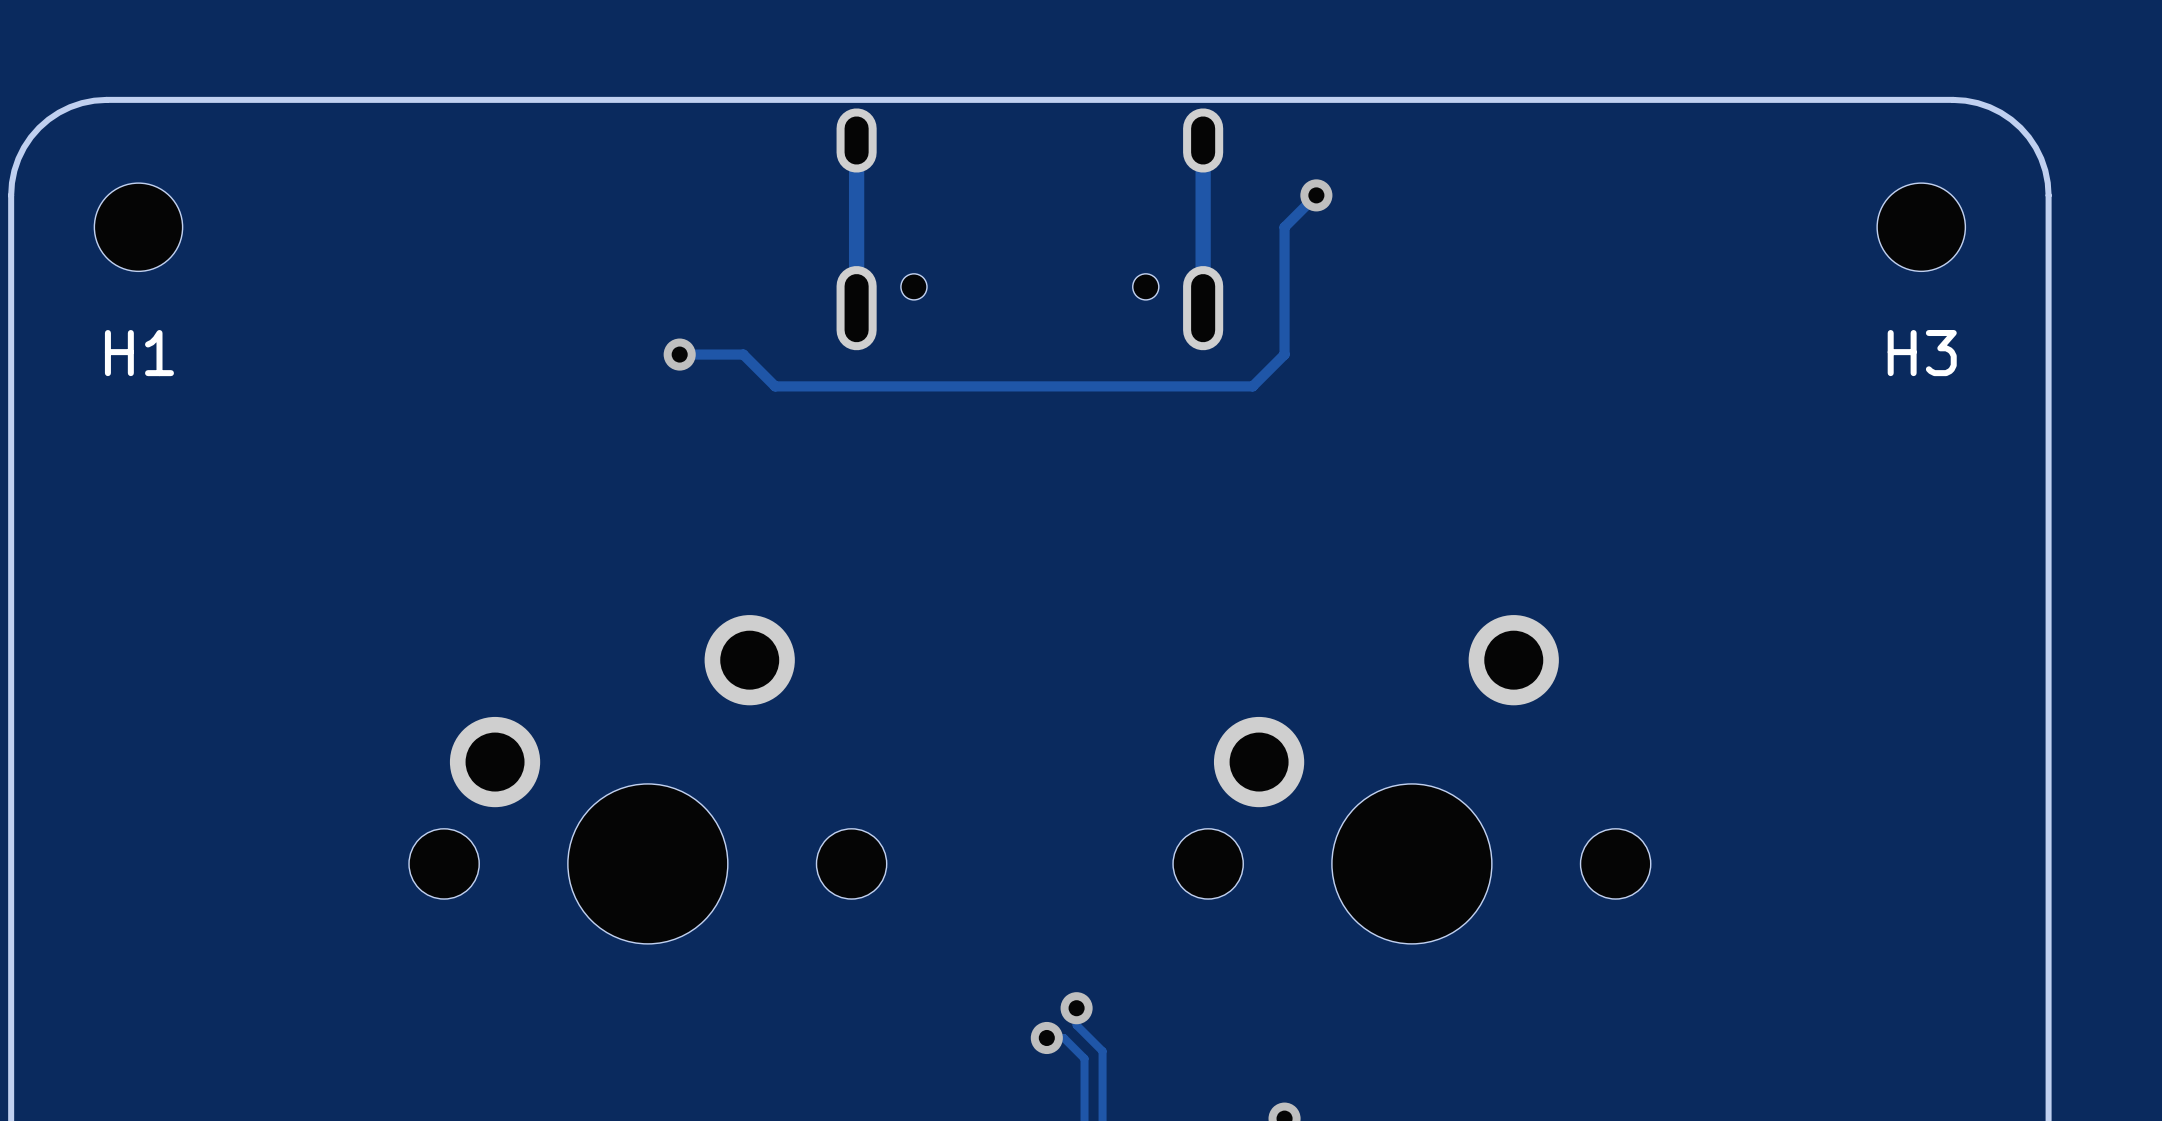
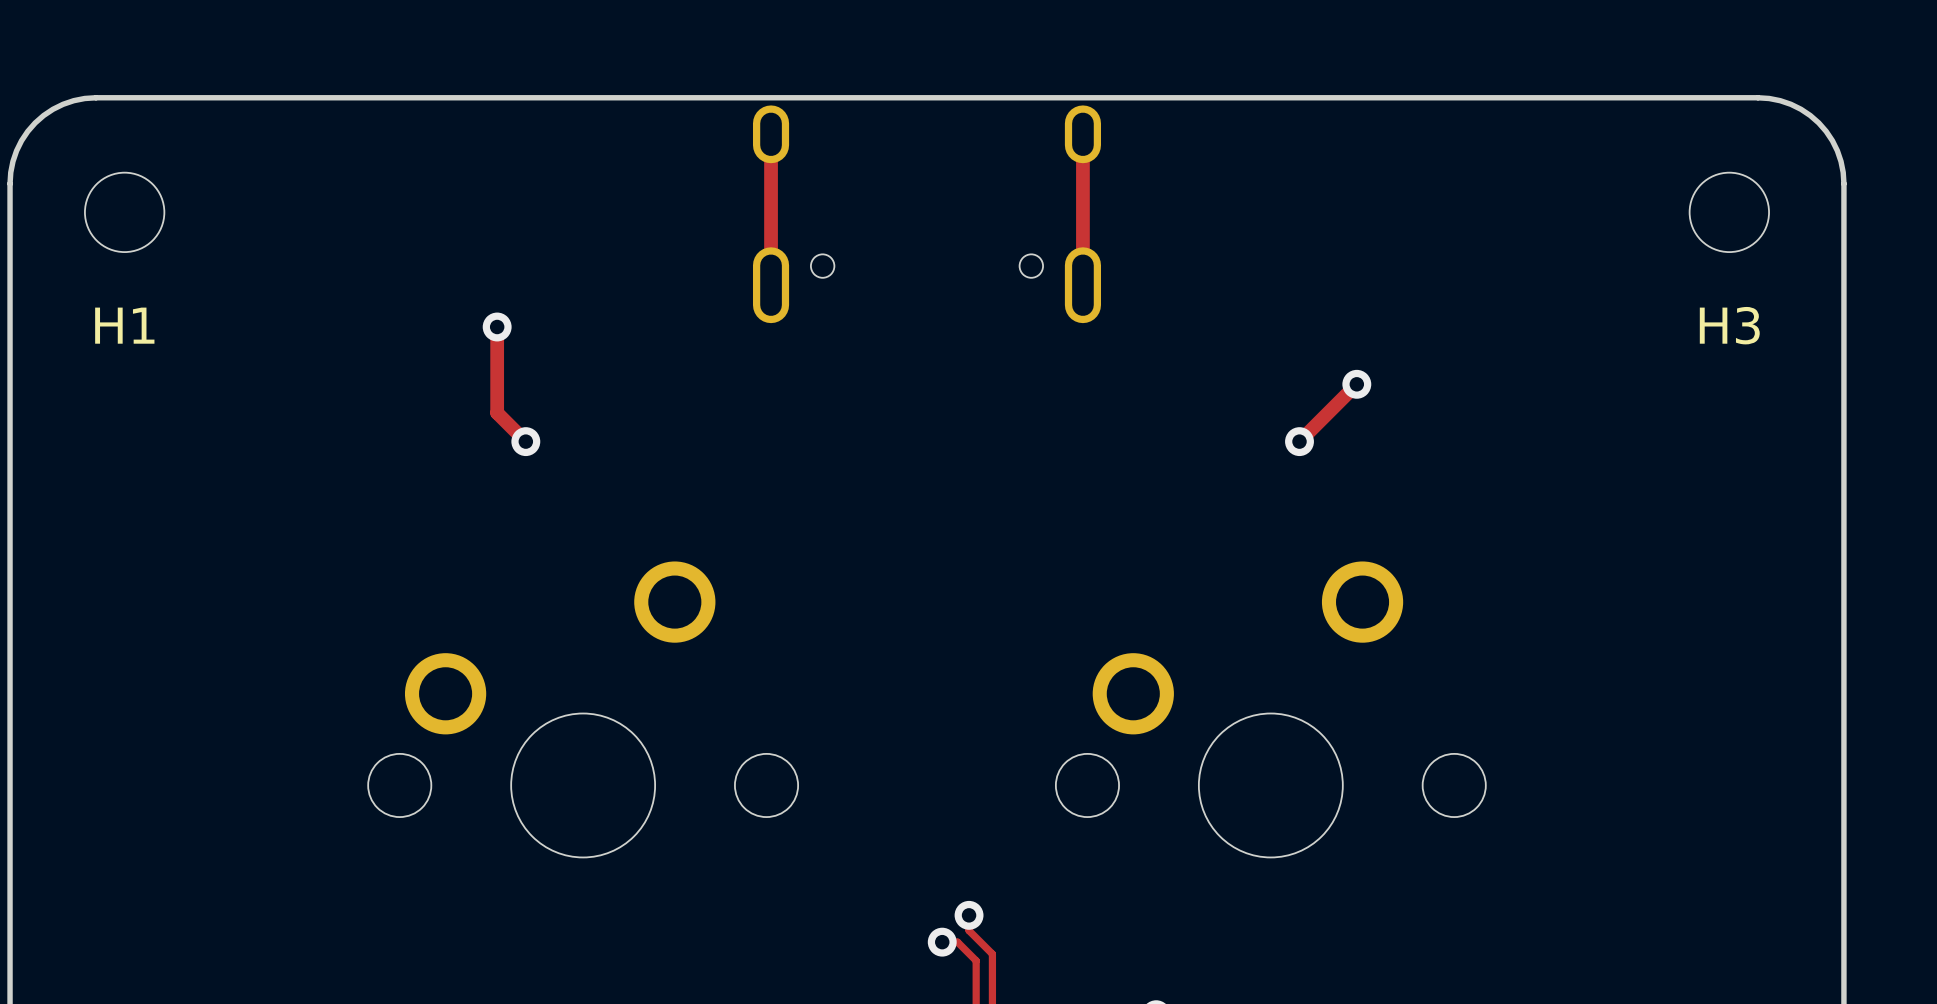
track: (1316, 195) (1284, 227) (1284, 354) (1252, 386) (775, 386) (743, 354) (679, 354) -> none
via: (1316, 195) -> none
track: none -> (497, 327) (497, 412) (525, 441)
via: none -> (497, 327)
via: (679, 354) -> none
track: none -> (1356, 384) (1299, 441)
via: none -> (1356, 384)
via: none -> (525, 441)
via: none -> (1299, 441)

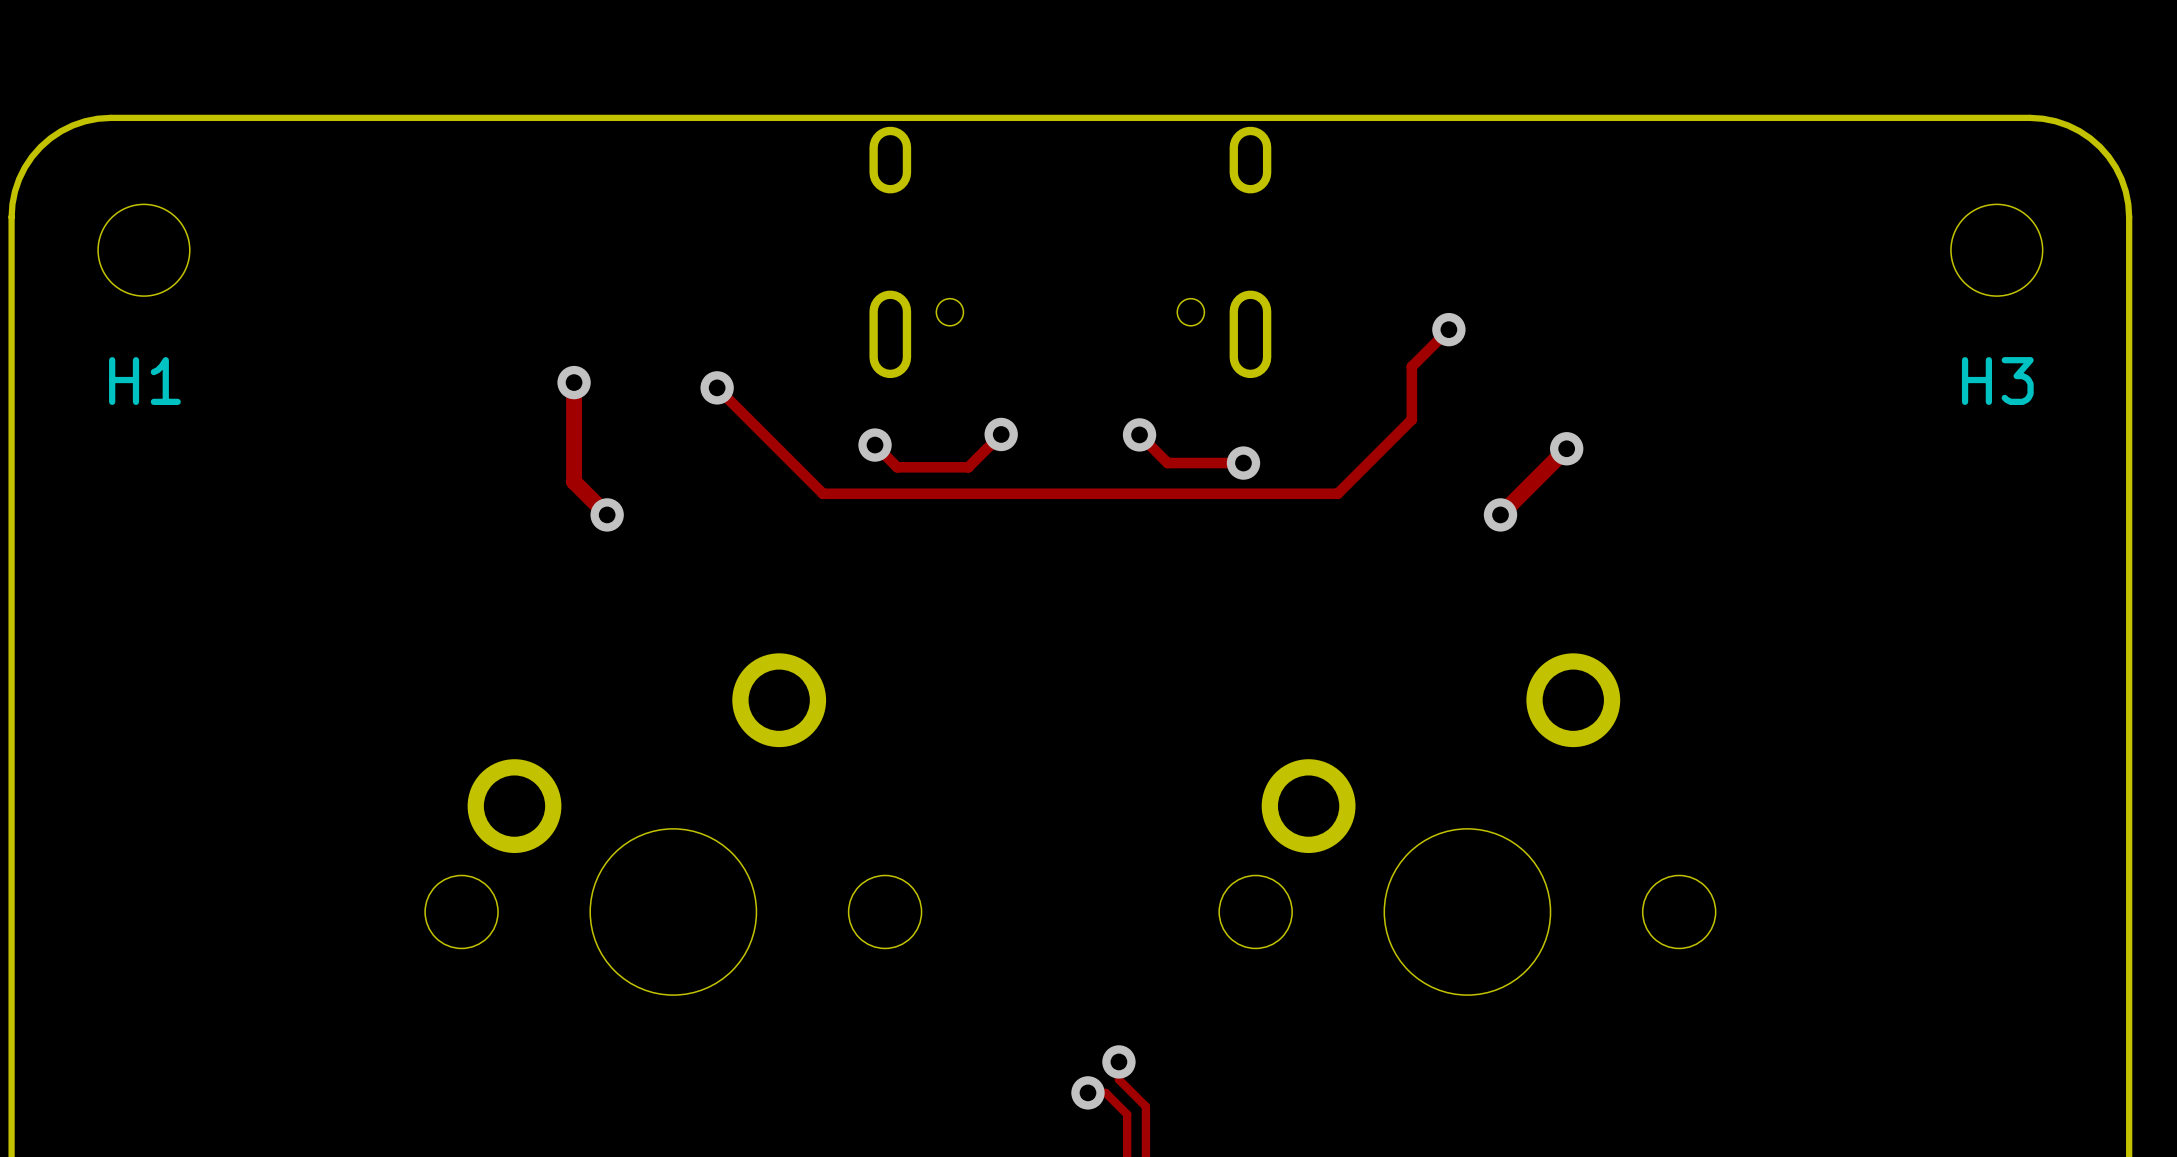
track: (771, 134) (771, 285) -> none
track: (1082, 134) (1082, 285) -> none
track: none -> (1448, 329) (1411, 366) (1411, 419) (1337, 493) (823, 493) (717, 387)
via: none -> (1448, 329)
via: none -> (717, 387)
track: none -> (1001, 434) (968, 467) (897, 467) (875, 445)
via: none -> (1001, 434)
track: none -> (1139, 434) (1167, 463) (1243, 463)
via: none -> (1139, 434)
via: none -> (875, 445)
via: none -> (1243, 463)

